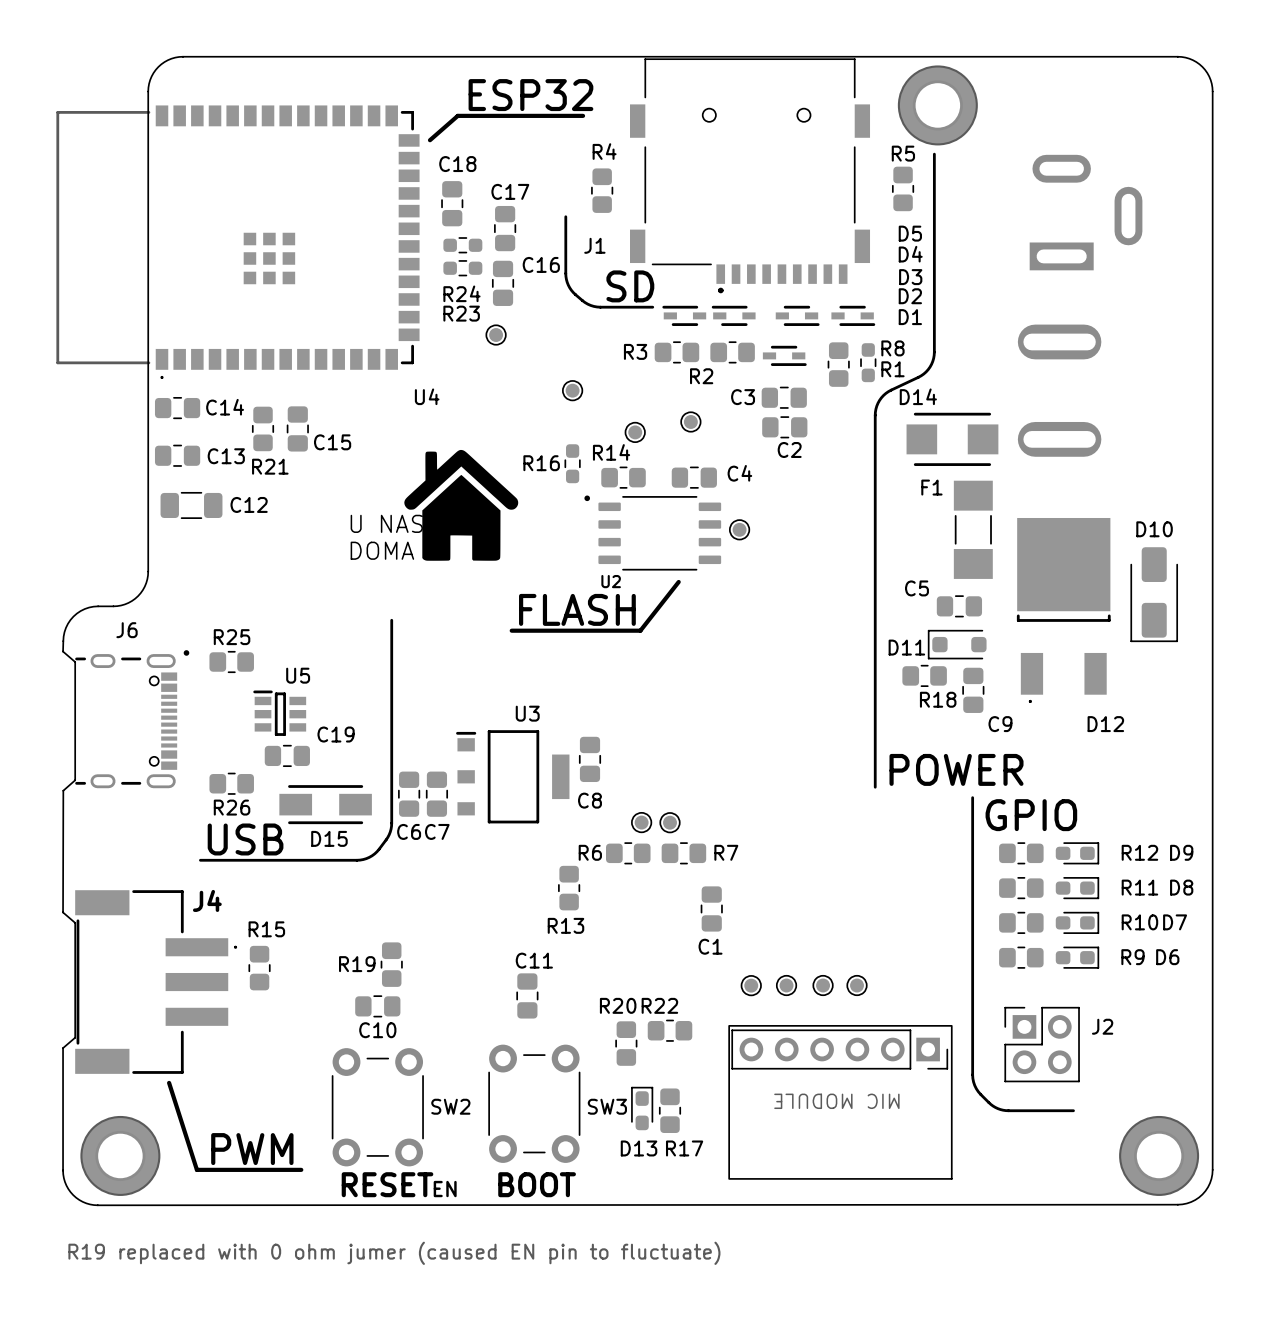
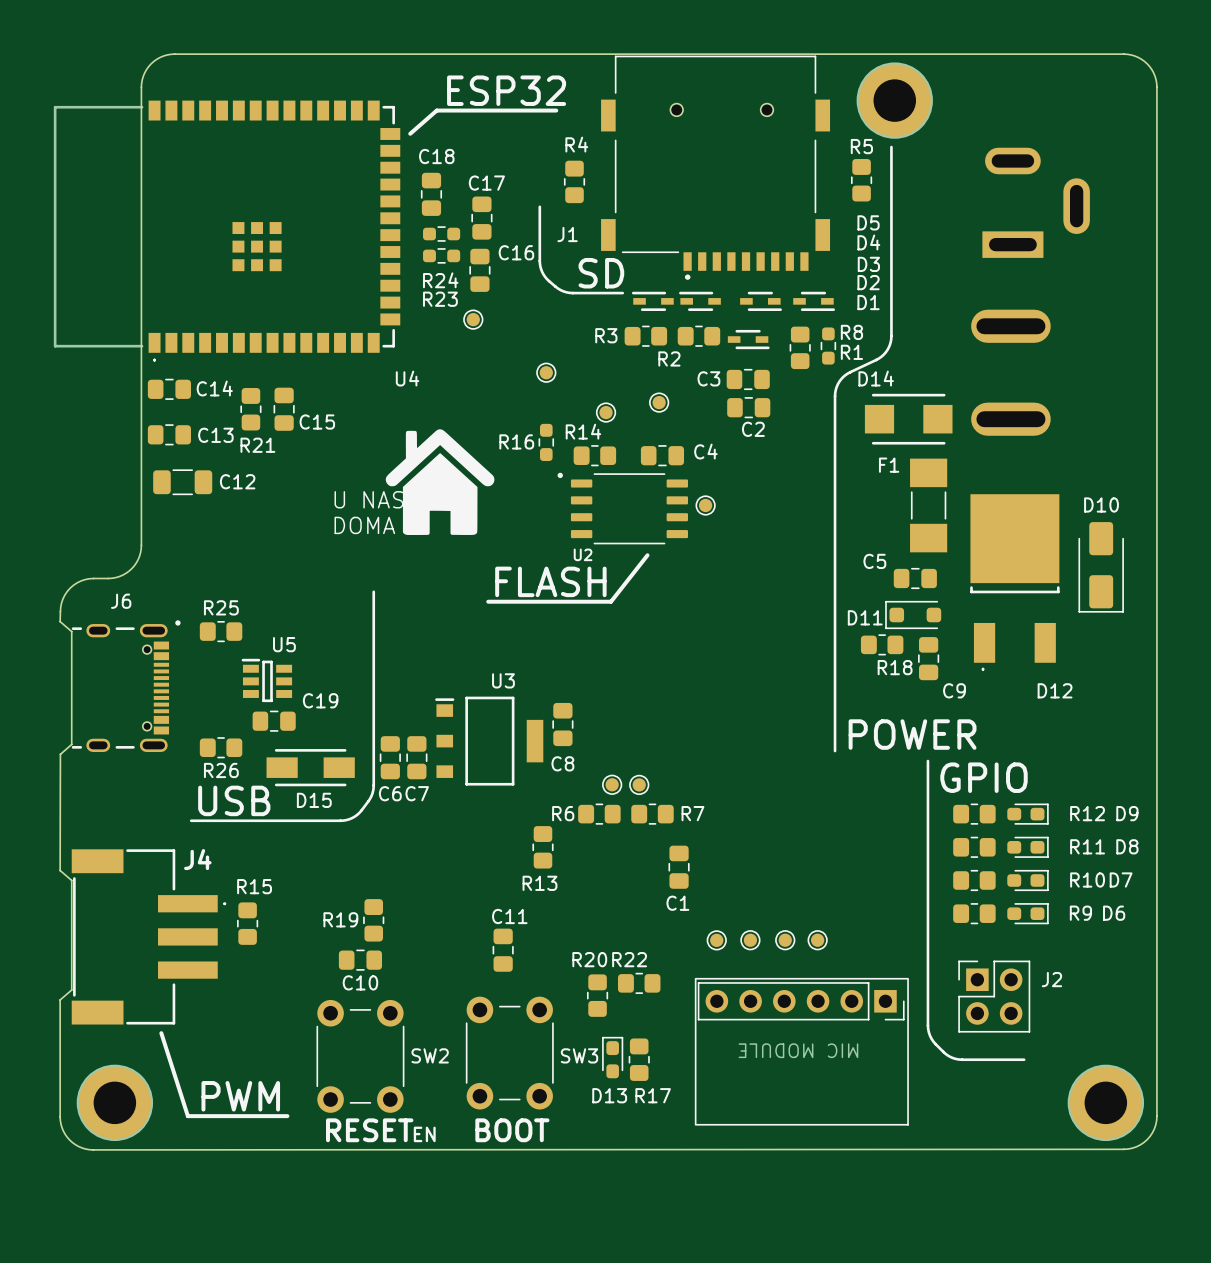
text: R19 replaced with 0 ohm jumer (caused EN pin to fluctuate) (394, 1253) -> none

